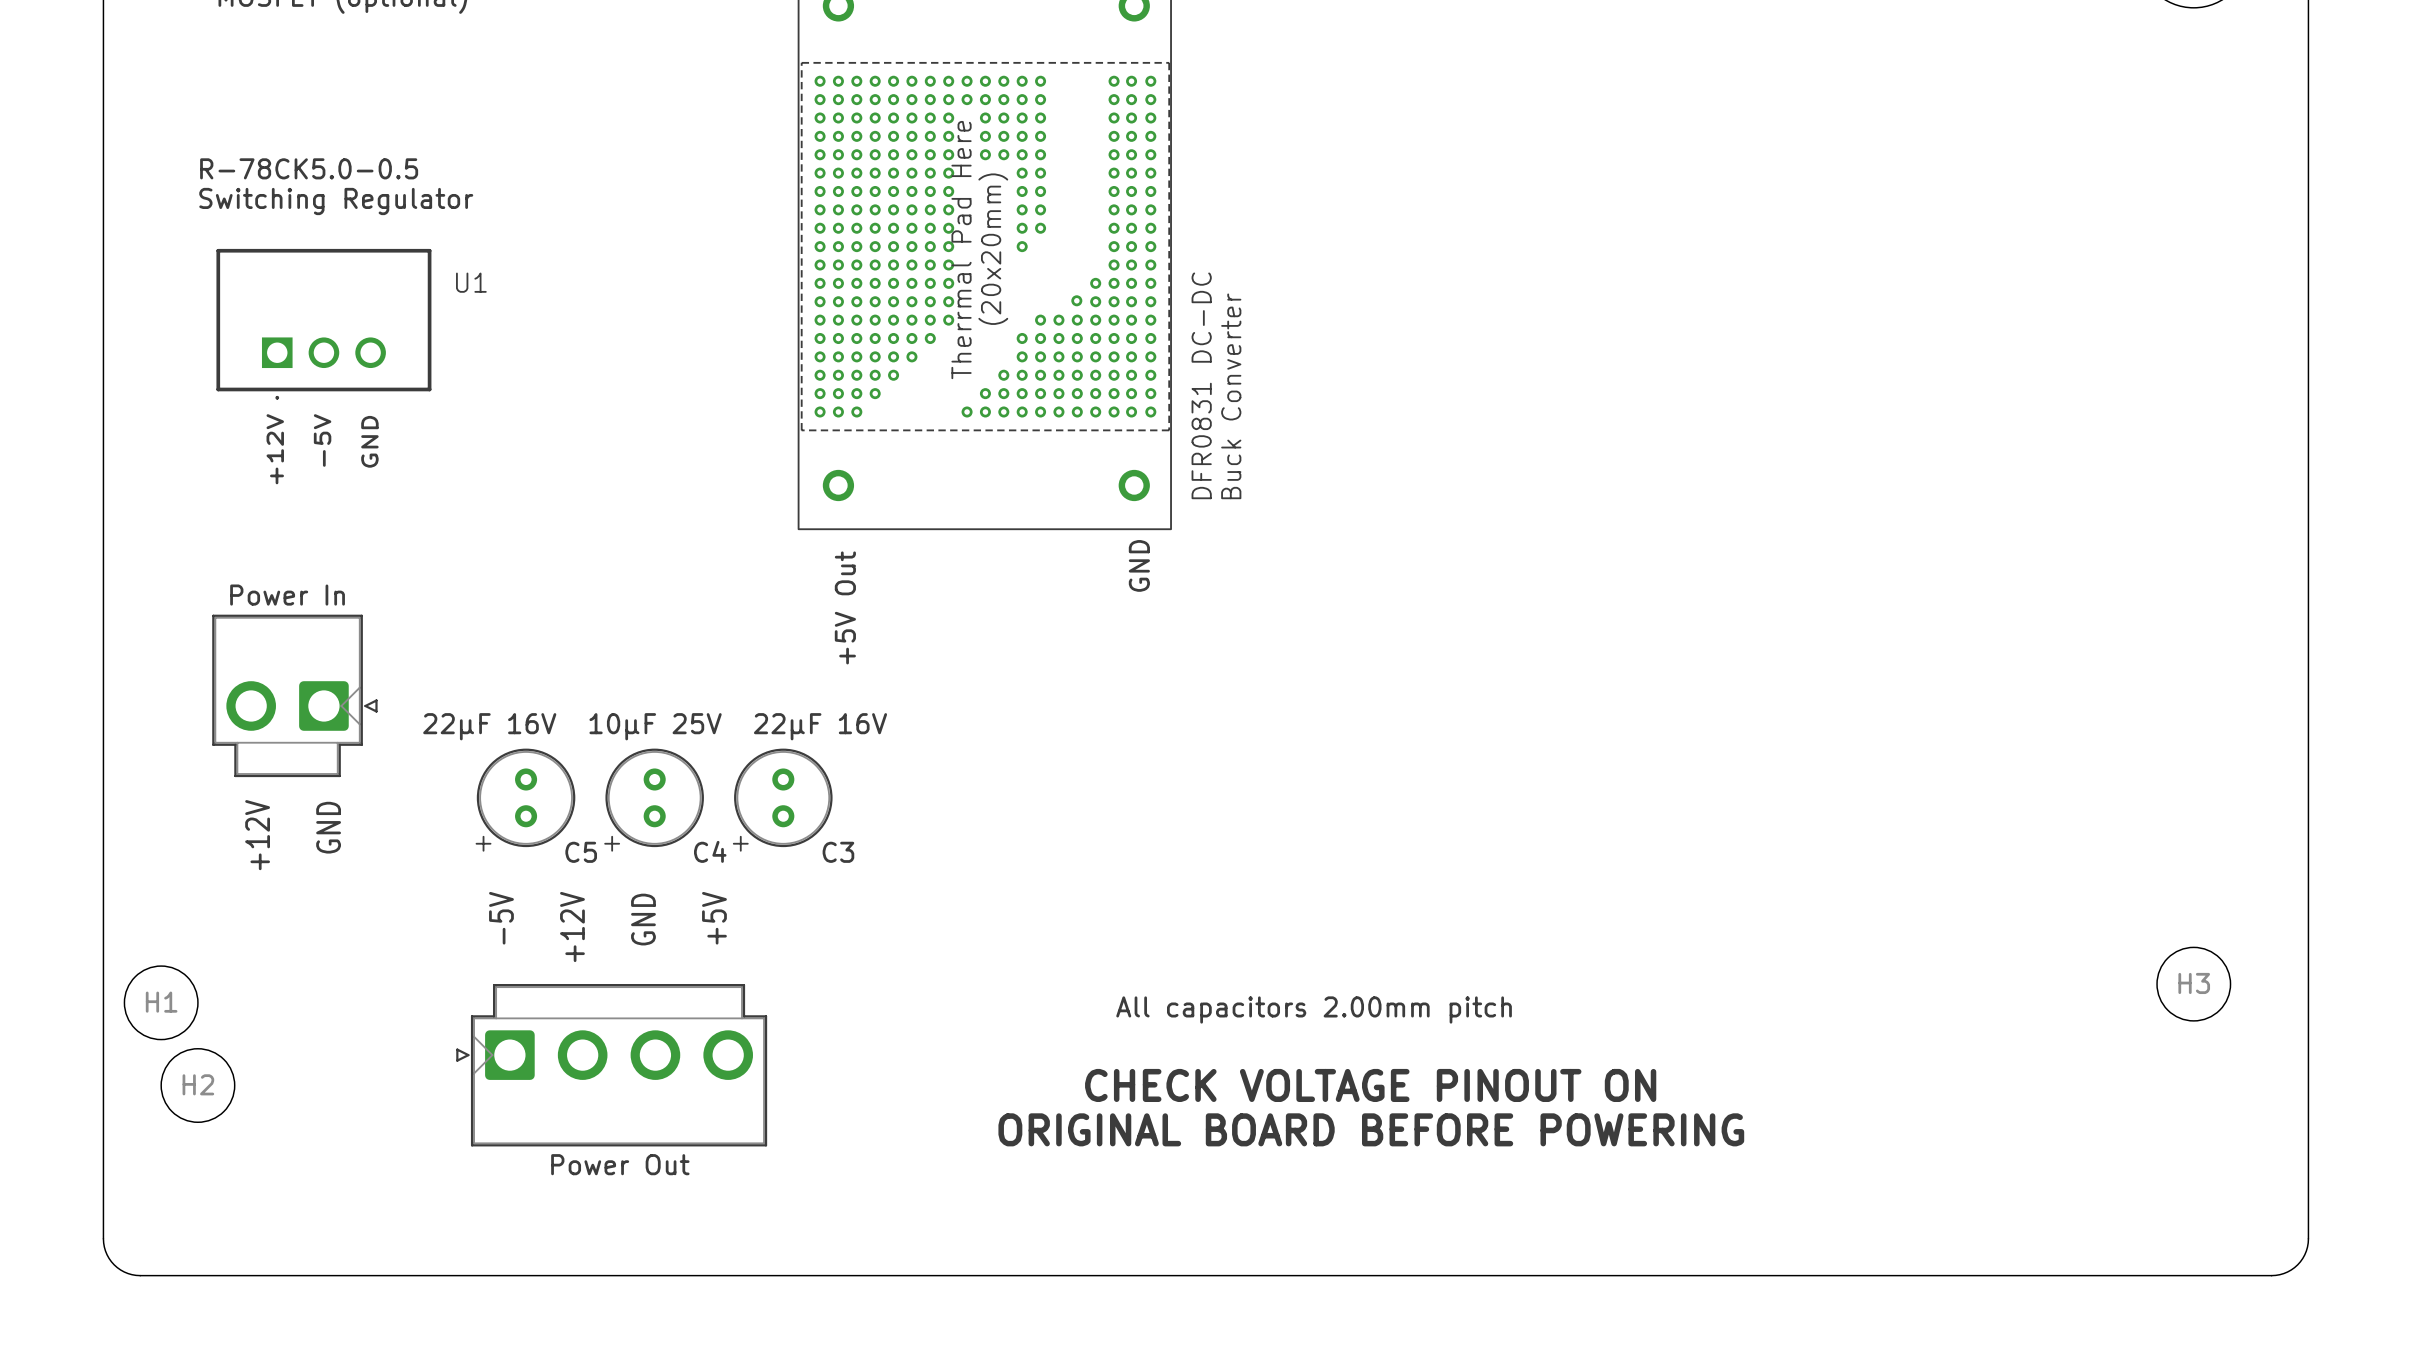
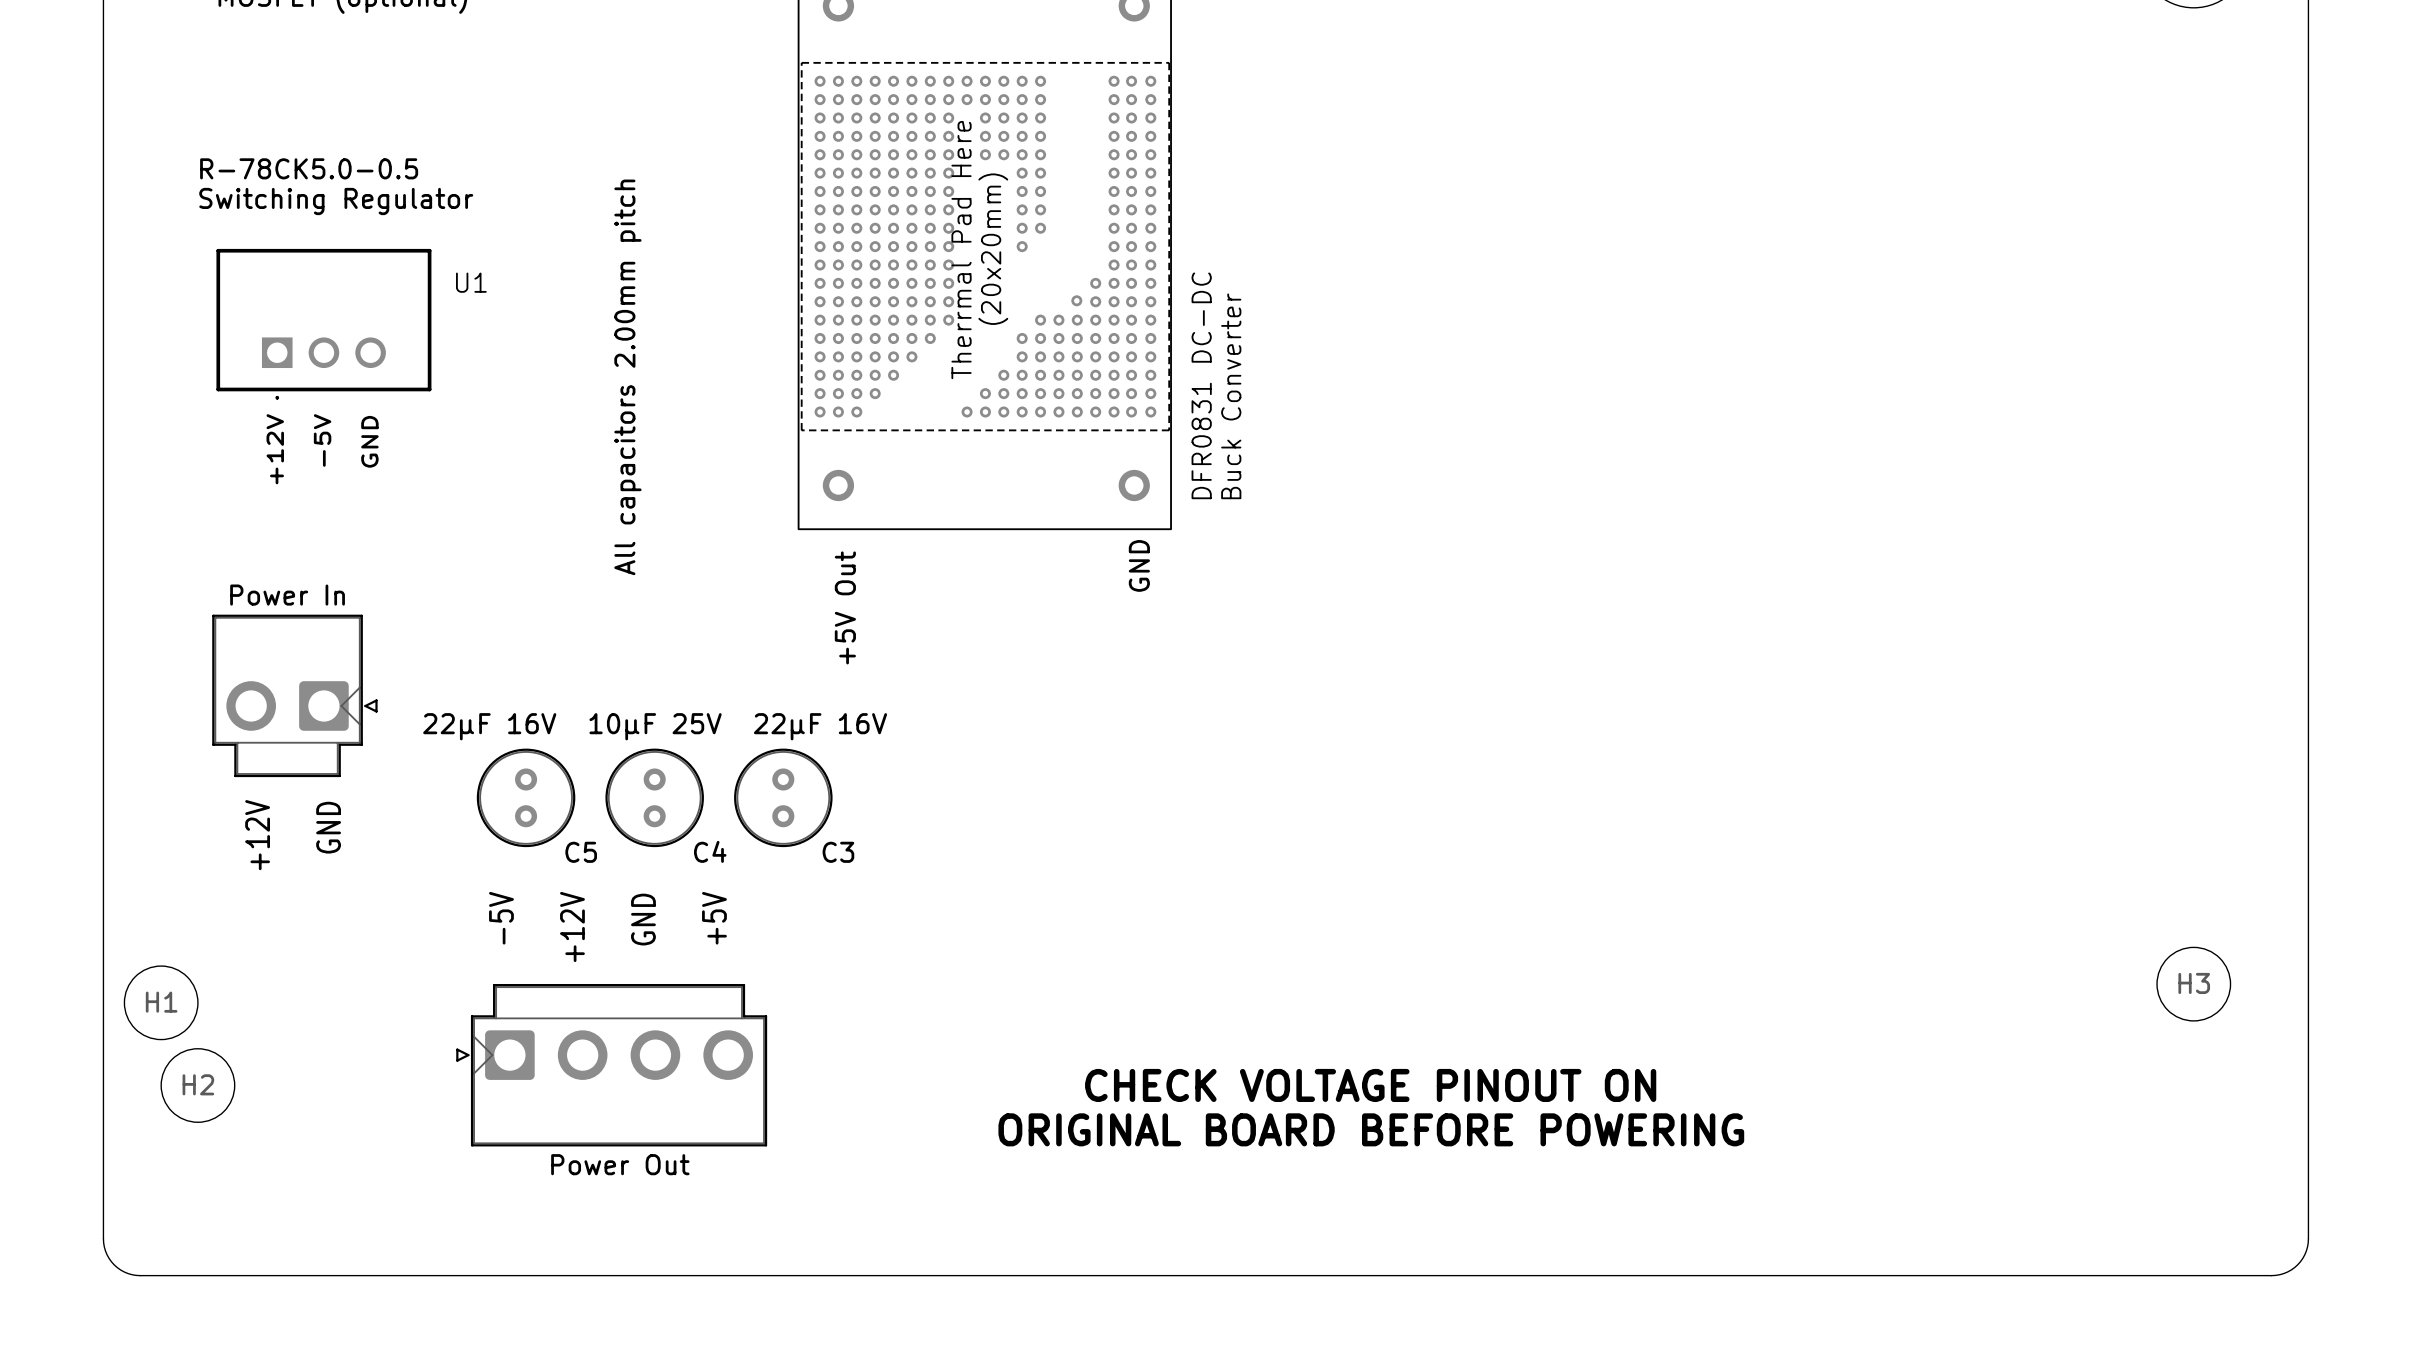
text: none -> All capacitors 2.00mm pitch (627, 377)
text: + (483, 843) -> none
text: + (612, 843) -> none
text: + (740, 843) -> none
text: All capacitors 2.00mm pitch (1314, 1009) -> none

